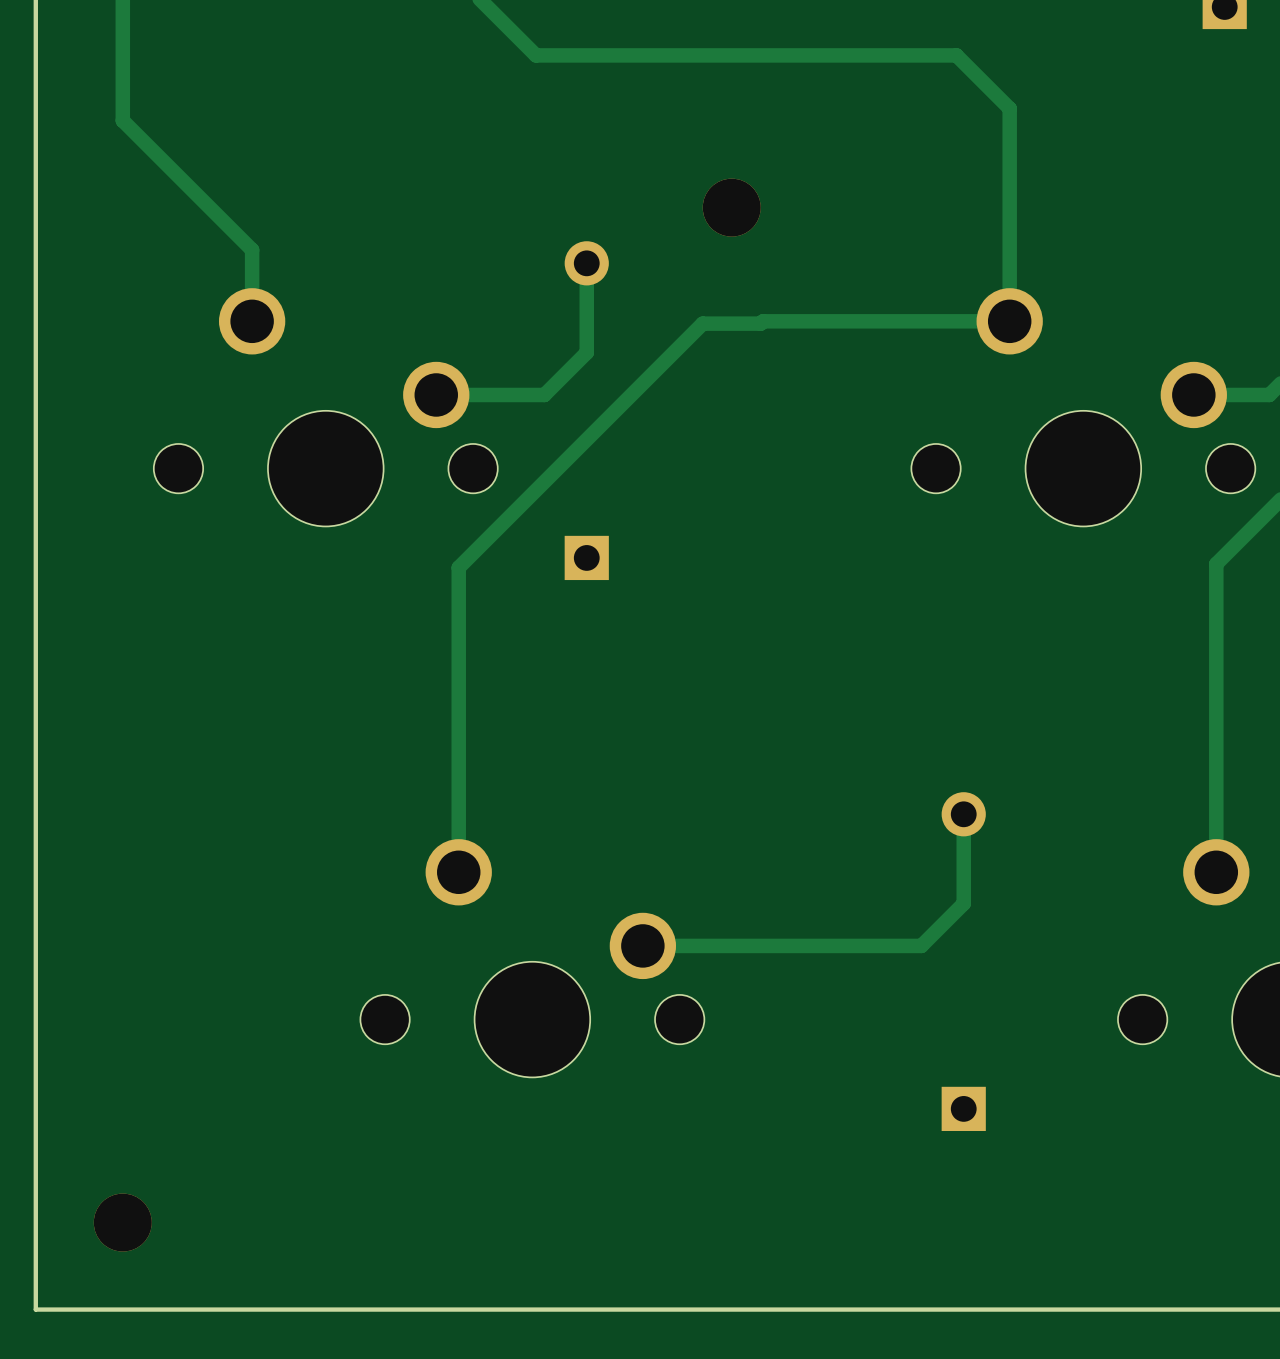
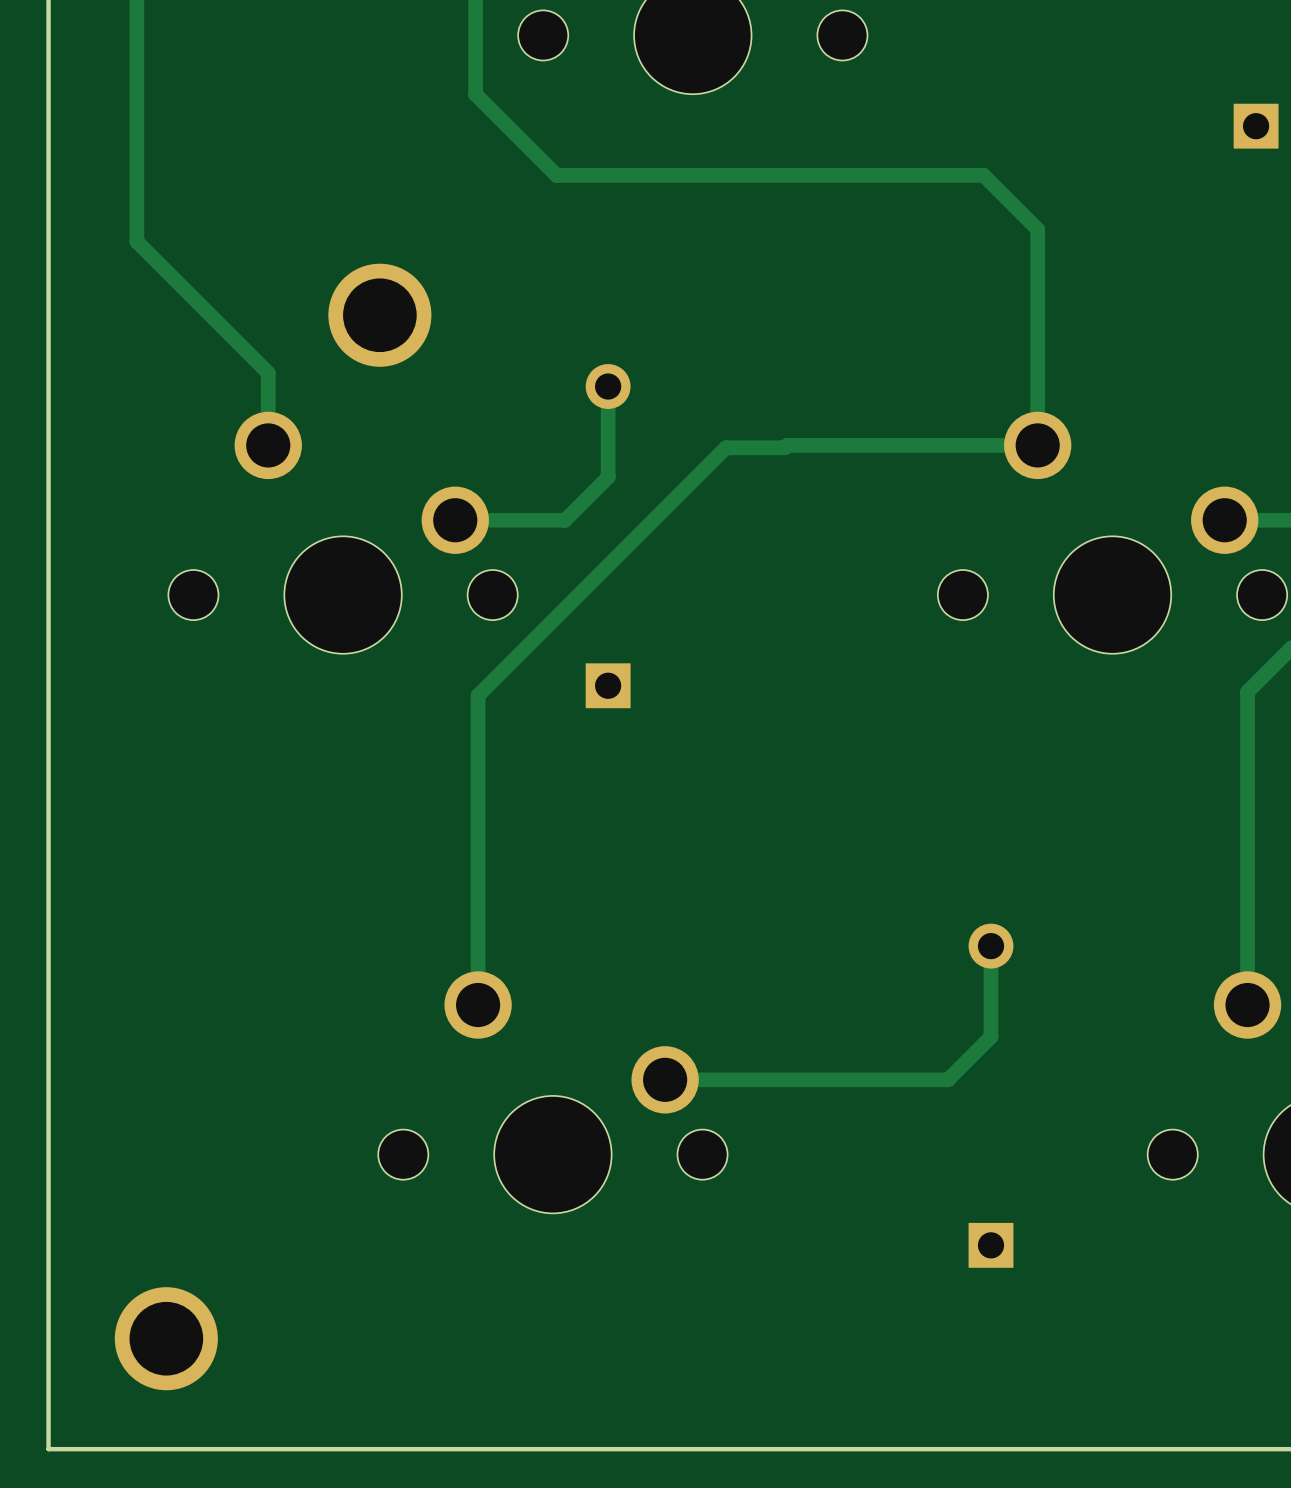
part: none -> (379, 315)
part: (731, 207) -> none
part: none -> (166, 1338)
part: (122, 1222) -> none

